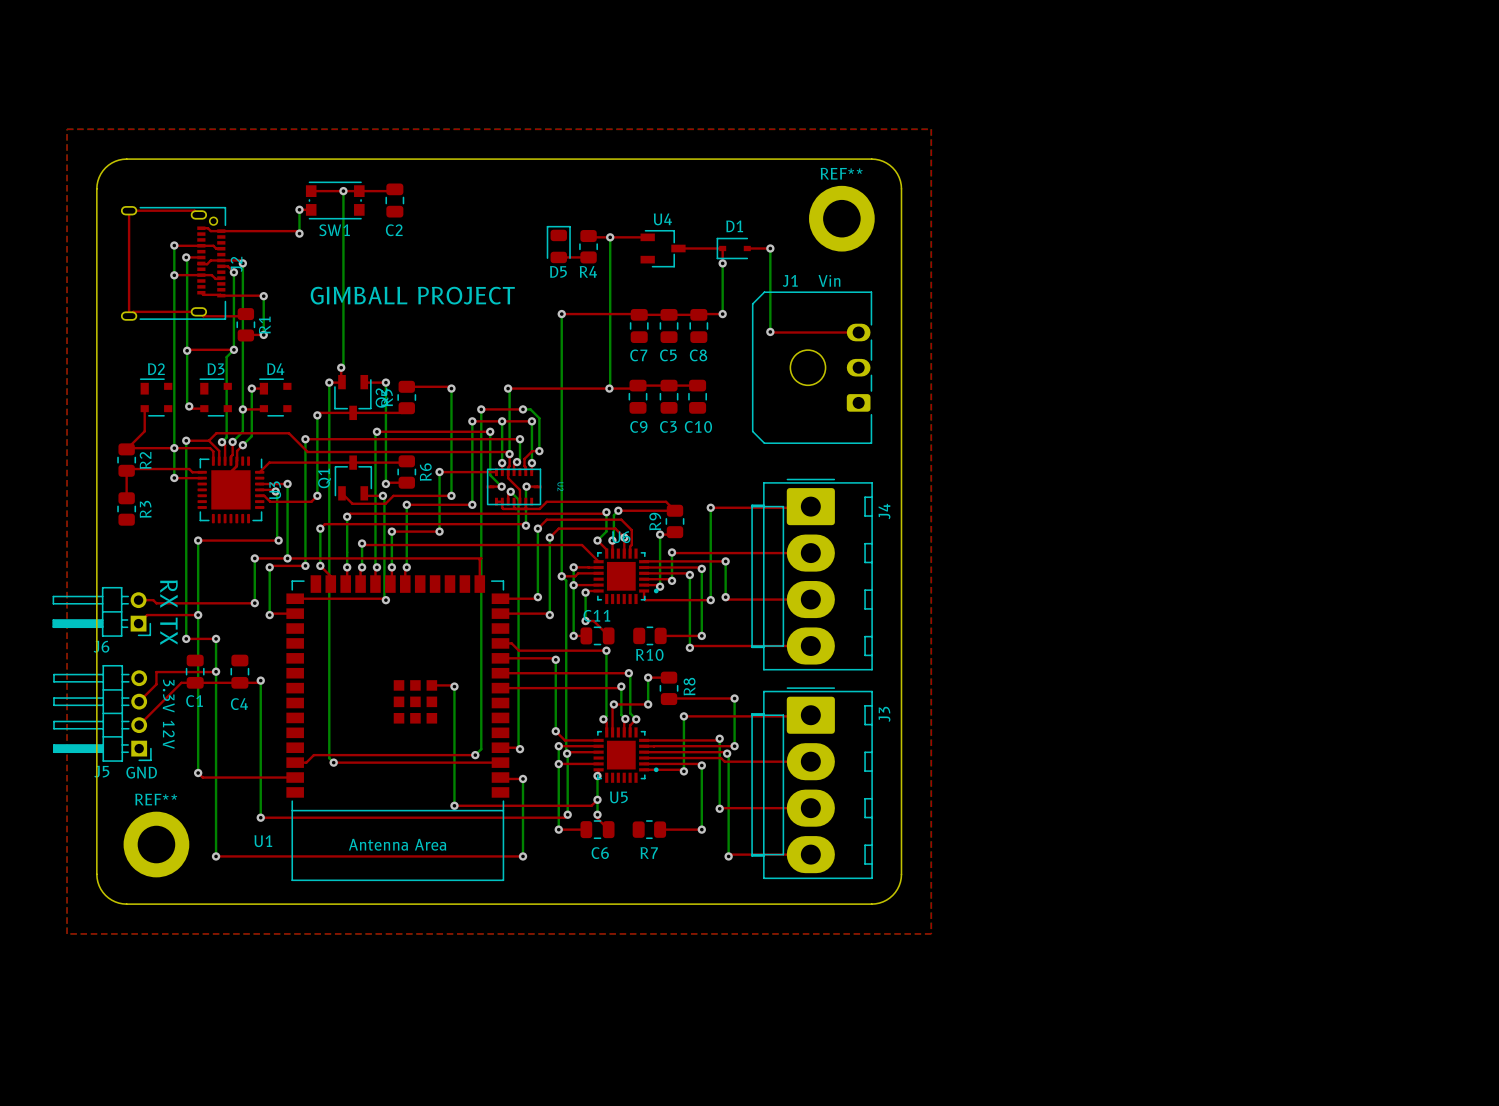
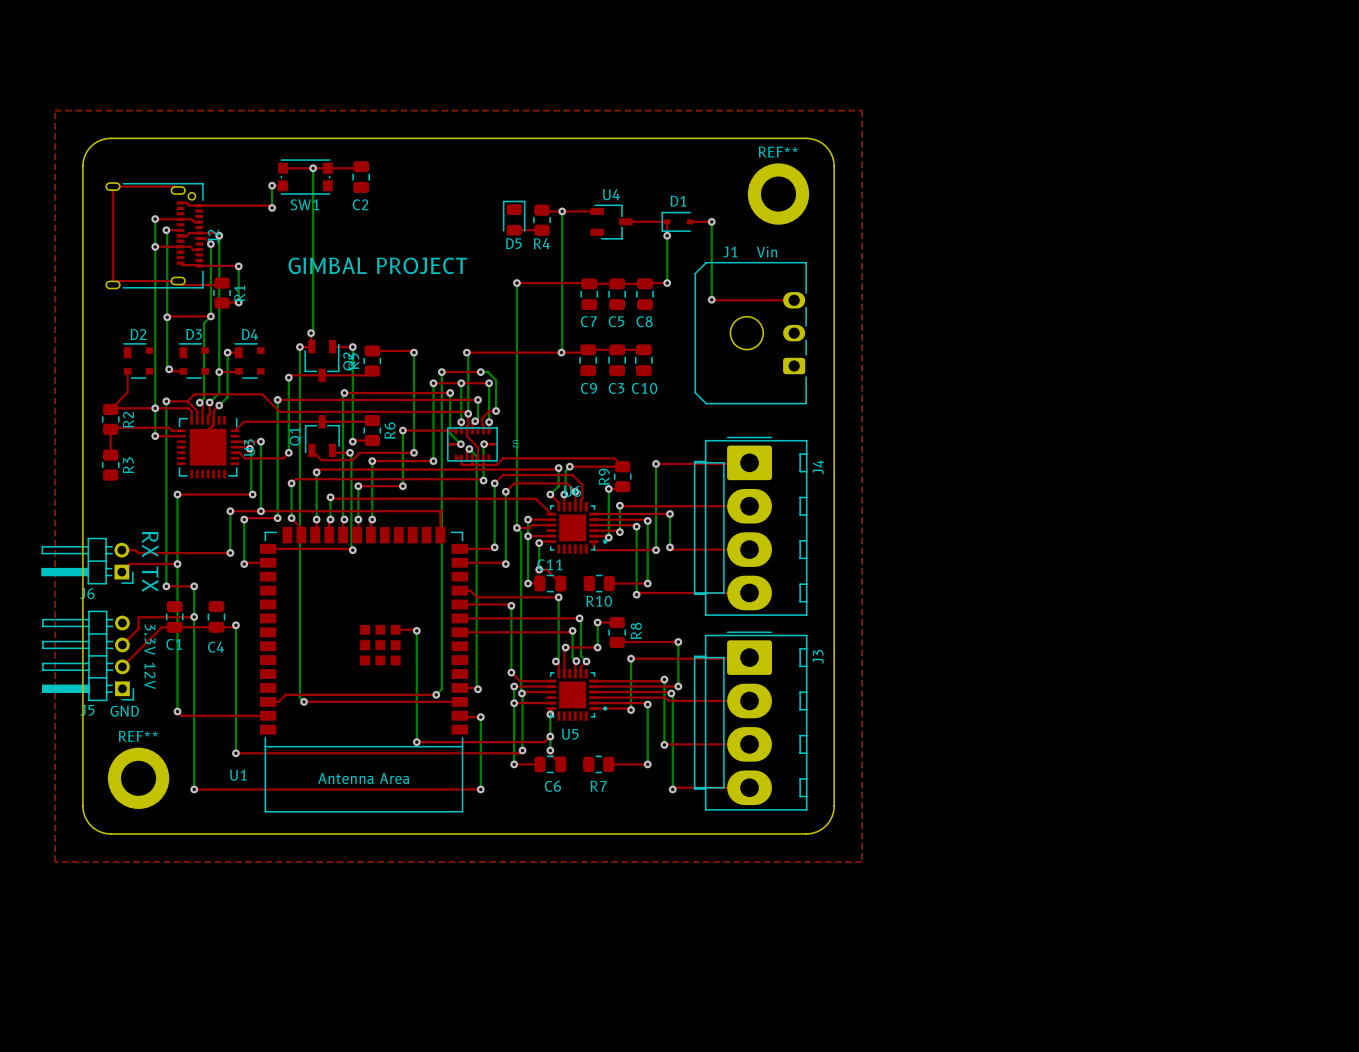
text: GIMBALL PROJECT (412, 295) -> GIMBAL PROJECT (377, 265)

